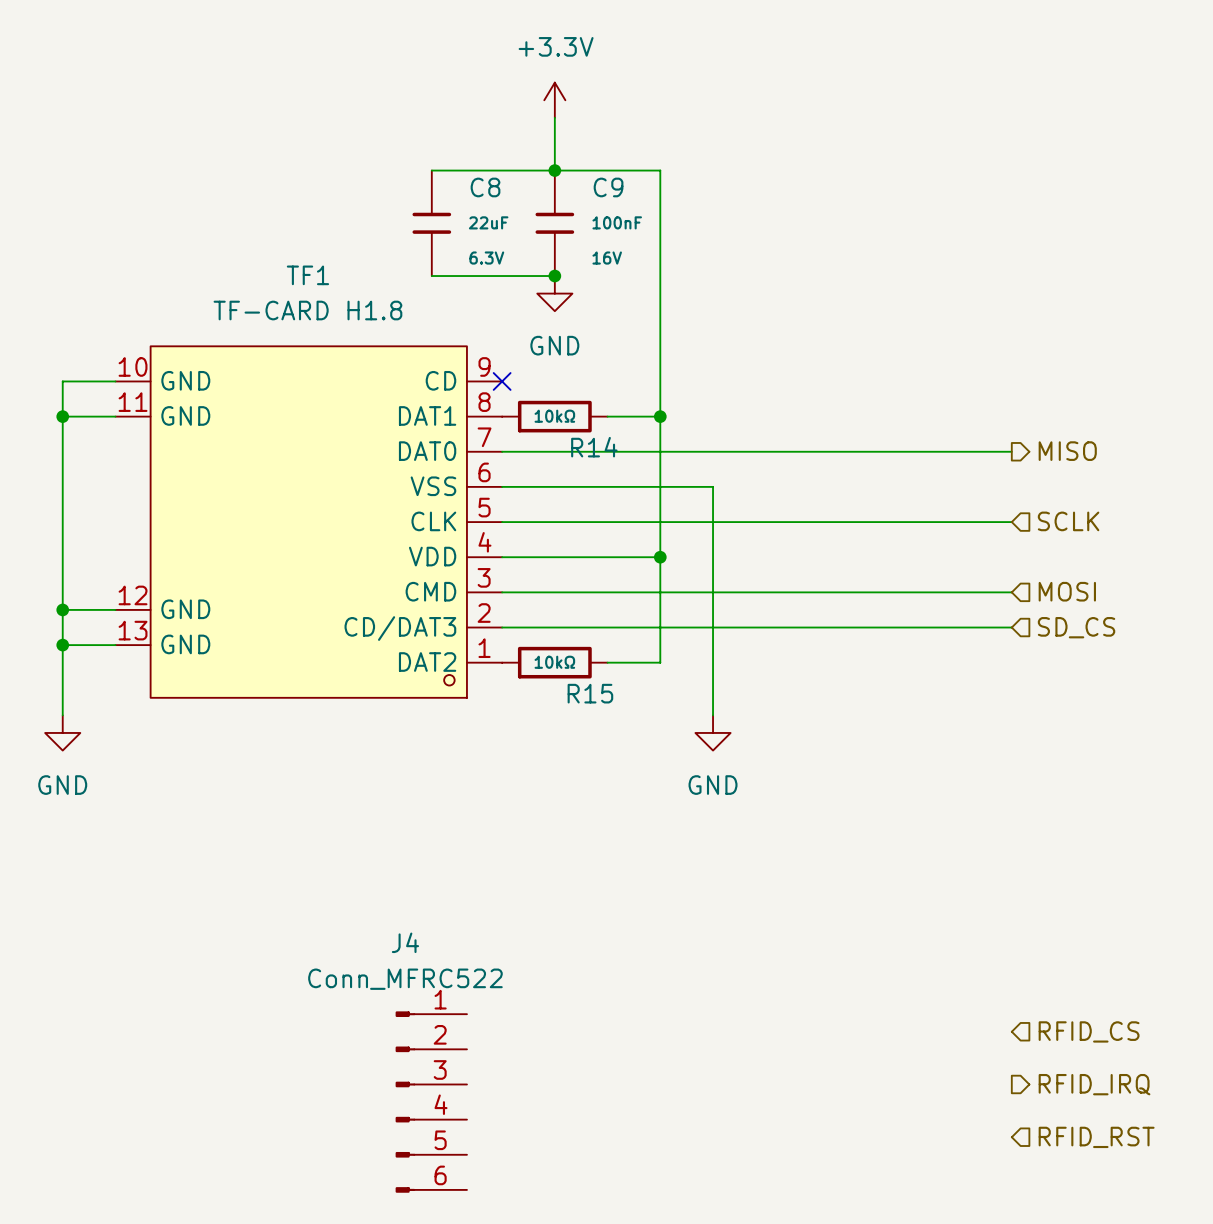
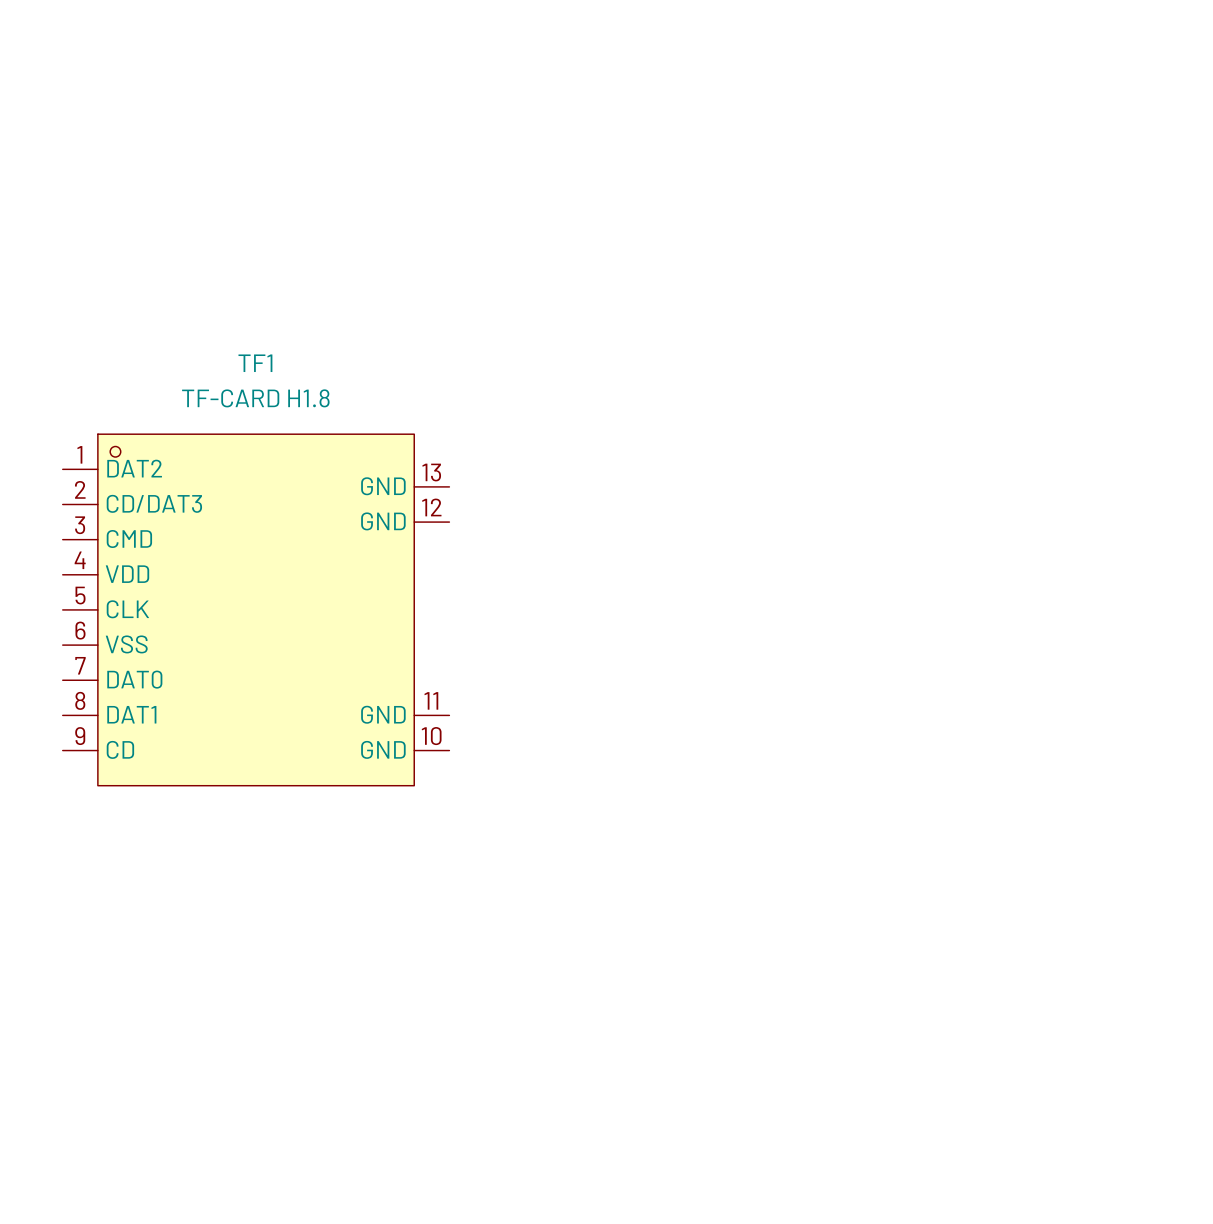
power symbol: +3.3V (554, 100) -> none
wire: (554, 117) (554, 170) -> none
wire: (431, 170) (660, 170) (660, 662) (607, 662) -> none
junction: (554, 170) -> none
C8: 22uF (431, 223) -> none
C9: 100nF (554, 223) -> none
wire: (431, 276) (554, 276) -> none
junction: (554, 276) -> none
power symbol: GND (554, 293) -> none
wire: (115, 381) (62, 381) (62, 715) -> none
no-connect mark: (502, 381) -> none
wire: (62, 416) (115, 416) -> none
junction: (62, 416) -> none
R14: 10kΩ (554, 416) -> none
wire: (607, 416) (660, 416) -> none
junction: (660, 416) -> none
wire: (502, 451) (1011, 451) -> none
hierarchical label: MISO (1067, 451) -> none
wire: (502, 486) (713, 486) (713, 715) -> none
hierarchical label: SCLK (1068, 521) -> none
TF1 rotation: 0° (308, 522) -> 180° (256, 609)
wire: (502, 522) (1011, 522) -> none
wire: (502, 557) (660, 557) -> none
junction: (660, 557) -> none
hierarchical label: MOSI (1067, 591) -> none
wire: (502, 592) (1011, 592) -> none
junction: (62, 609) -> none
wire: (502, 627) (1011, 627) -> none
hierarchical label: SD_CS (1076, 627) -> none
junction: (62, 645) -> none
R15: 10kΩ (554, 662) -> none
power symbol: GND (62, 732) -> none
power symbol: GND (713, 732) -> none
hierarchical label: RFID_CS (1089, 1031) -> none
hierarchical label: RFID_IRQ (1094, 1084) -> none
J4: Conn_MFRC522 (431, 1102) -> none
hierarchical label: RFID_RST (1096, 1137) -> none

